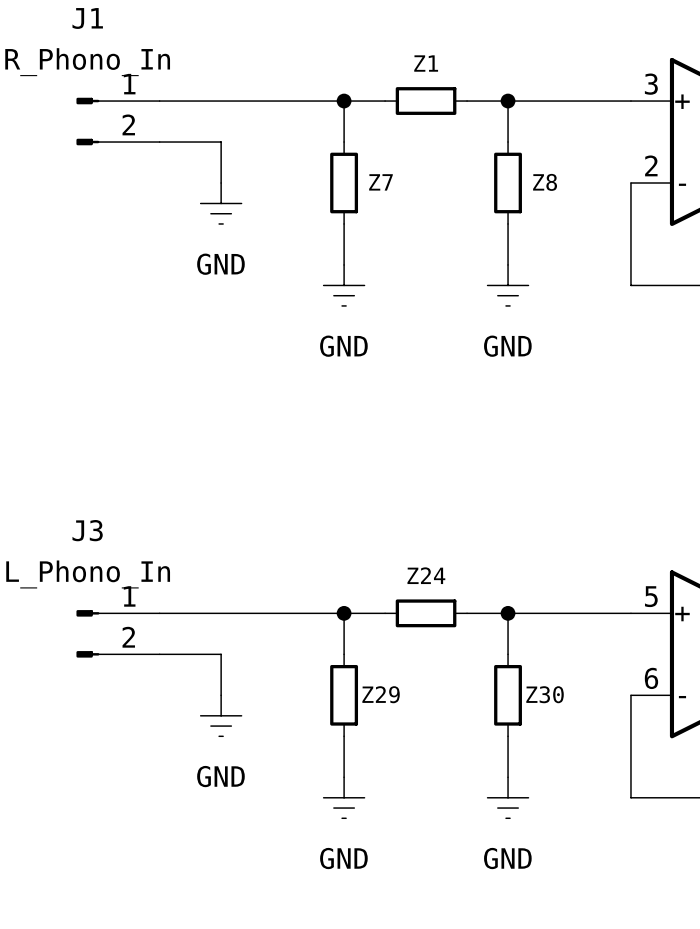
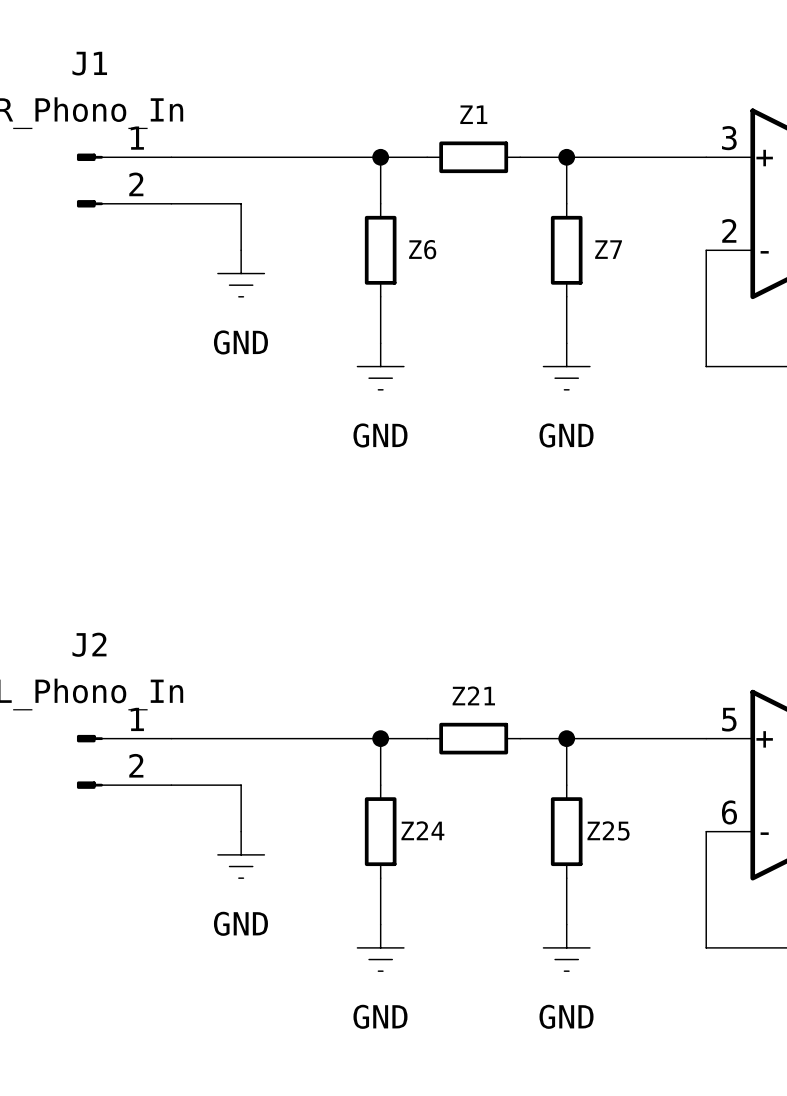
Z7 name: Z7 (380, 182) -> Z6 (422, 249)
Z8 name: Z8 (545, 182) -> Z7 (608, 249)
J3 name: J3 (87, 530) -> J2 (89, 644)
Z24 name: Z24 (426, 575) -> Z21 (473, 695)
Z29 name: Z29 (381, 694) -> Z24 (422, 830)
Z30 name: Z30 (545, 694) -> Z25 (608, 830)

